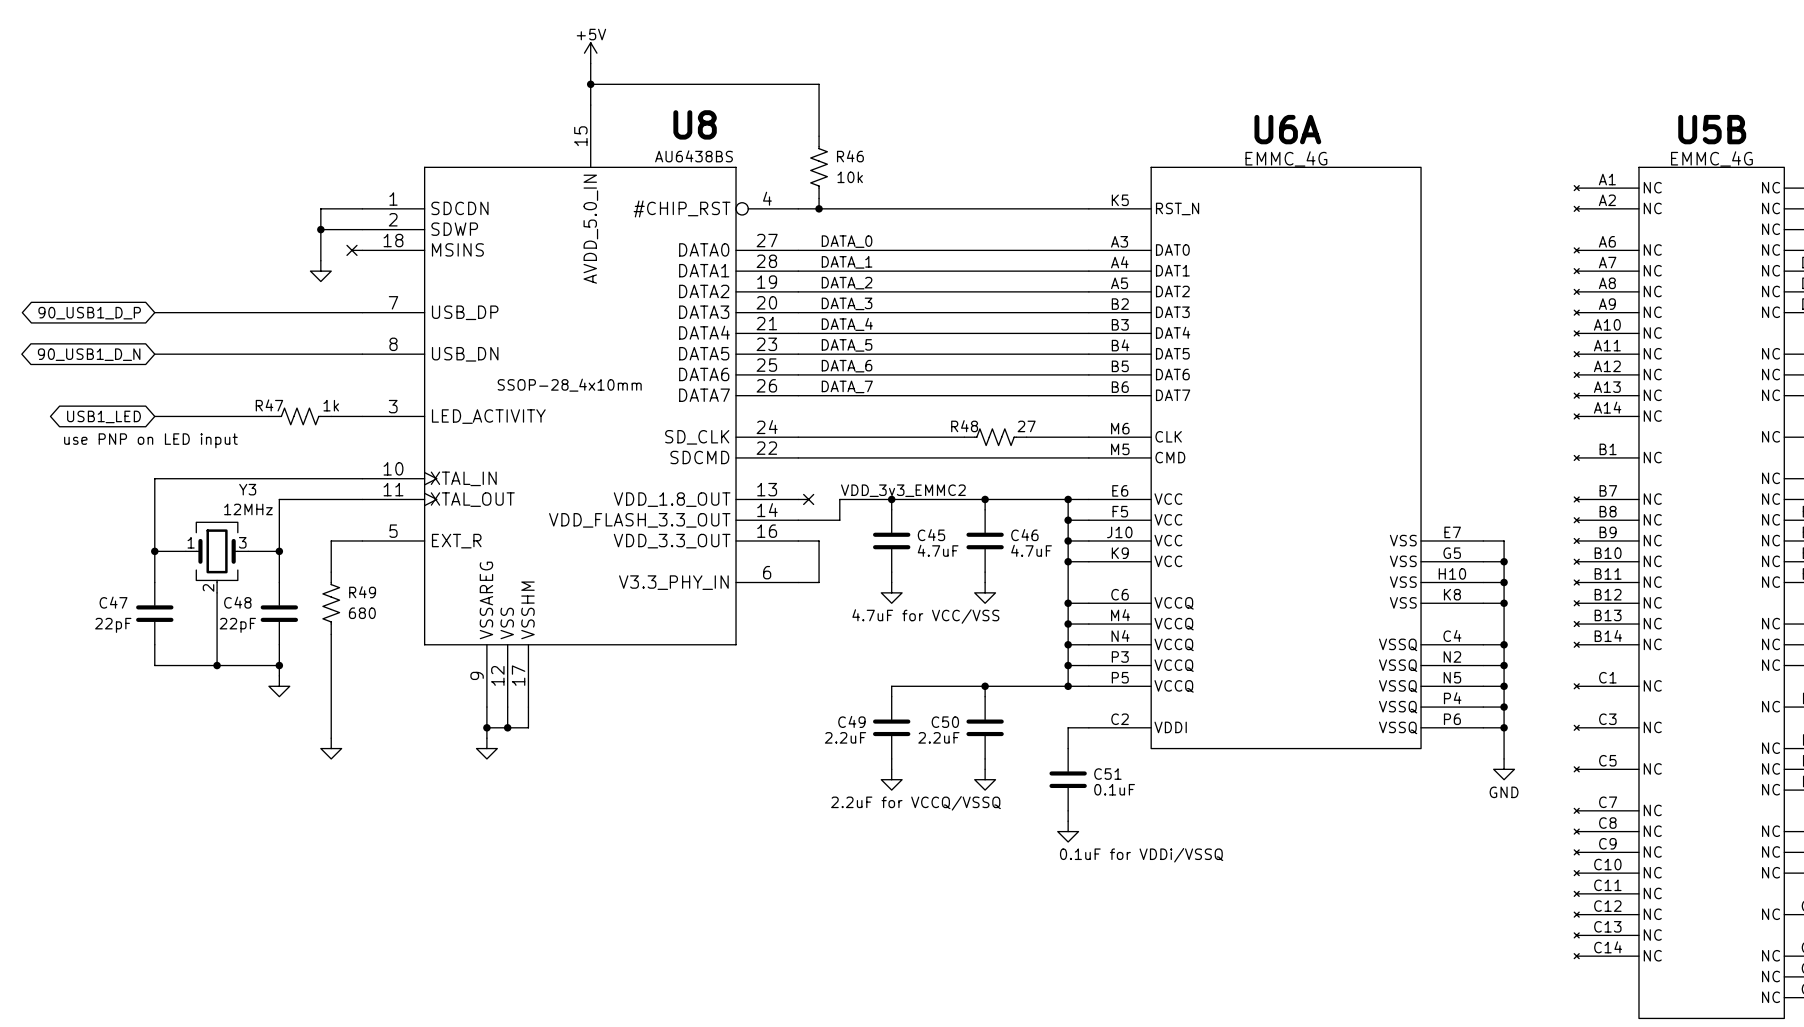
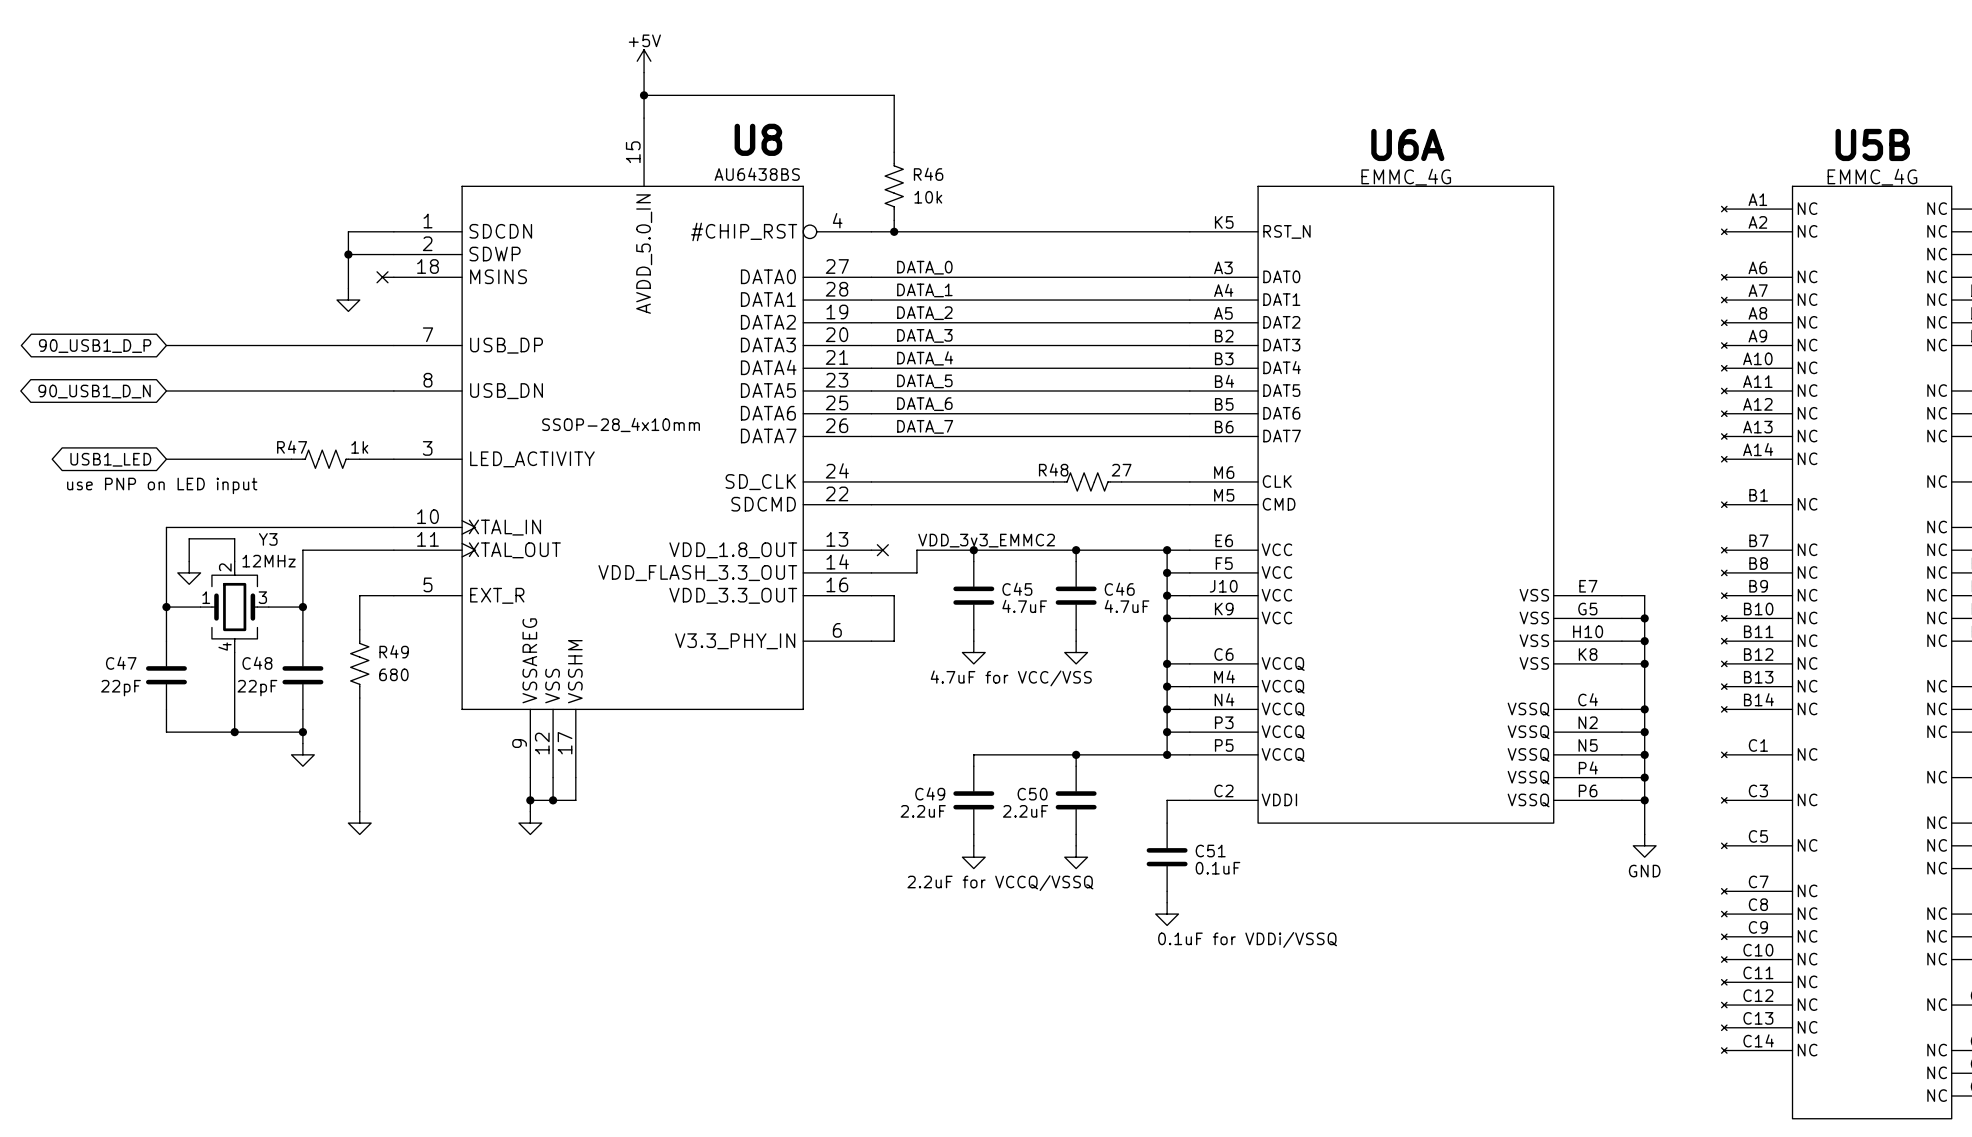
wire: none -> (189, 561) (189, 538) (234, 538) (234, 561)
power symbol: none -> (189, 572)
Y3 symbol: [185, 522, 249, 593] -> [200, 561, 269, 653]

